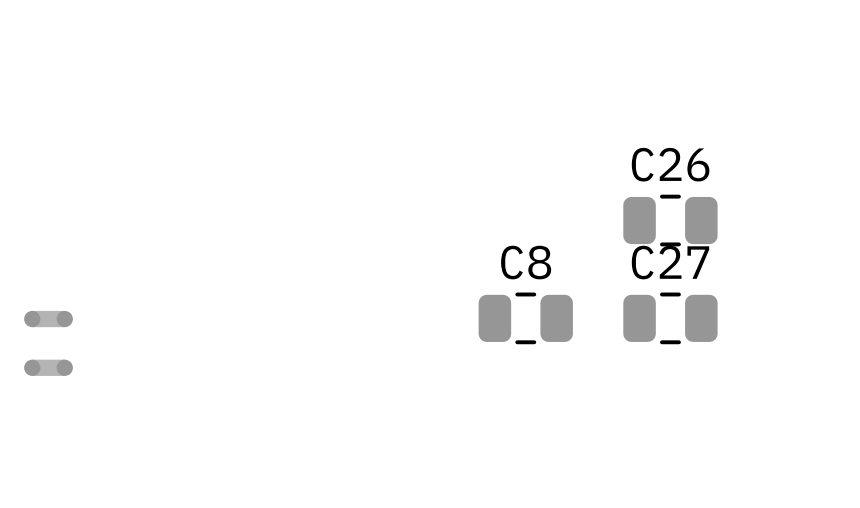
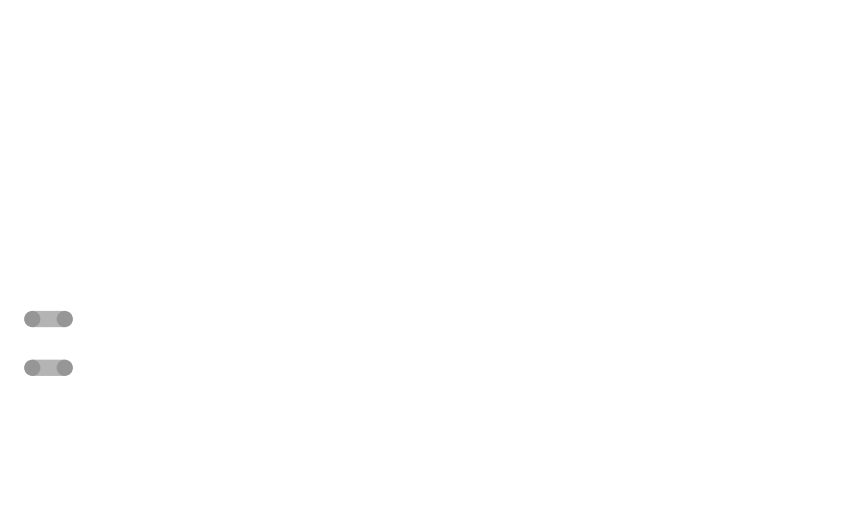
C26: (670, 220) -> none
C8: (525, 318) -> none
C27: (670, 318) -> none

